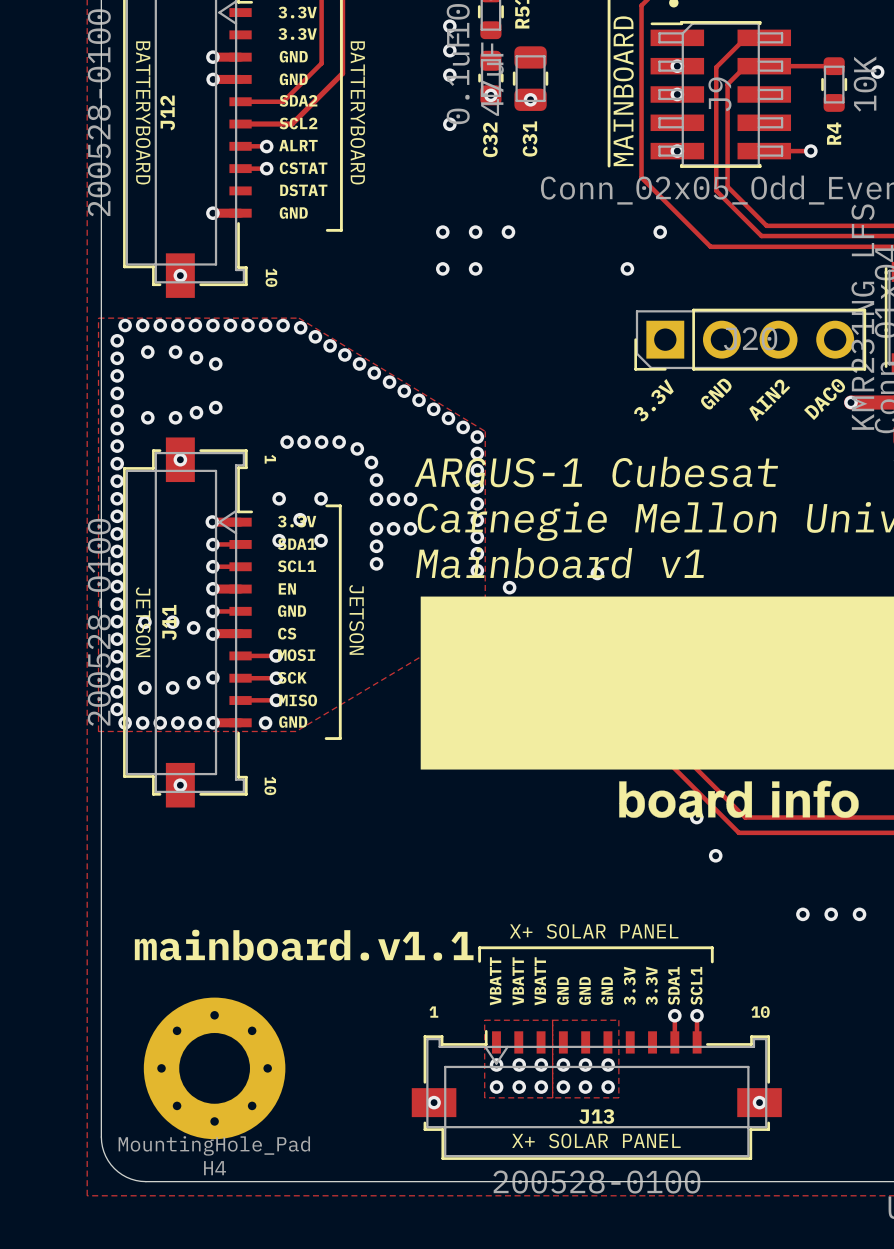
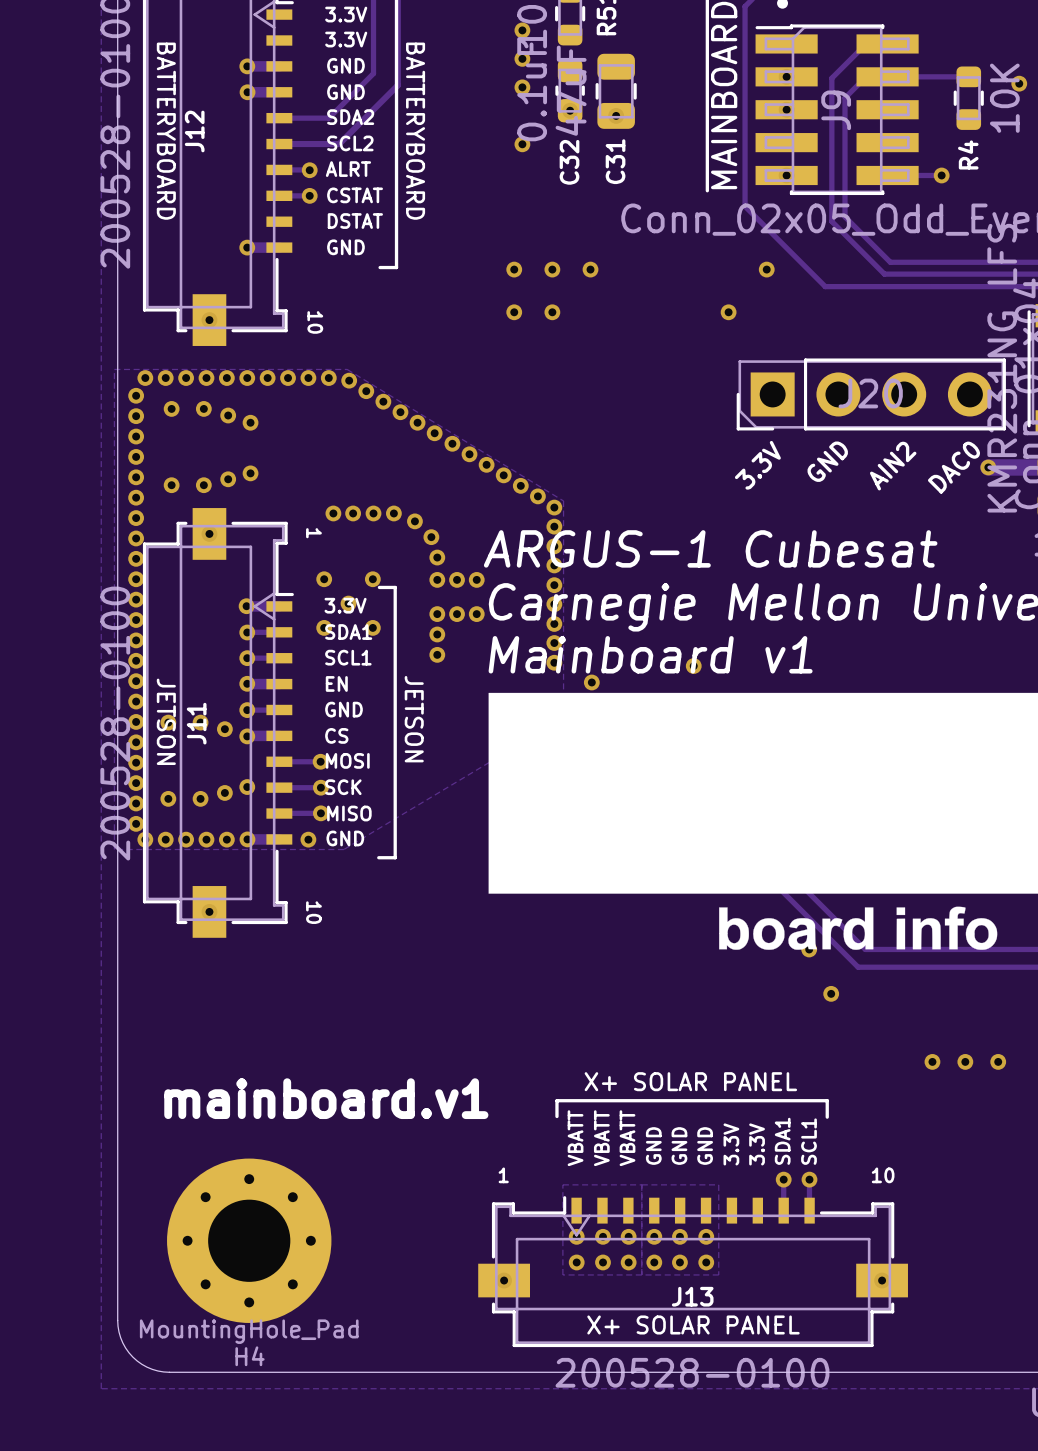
text: mainboard.v1.1 (304, 945) -> mainboard.v1 (326, 1098)

